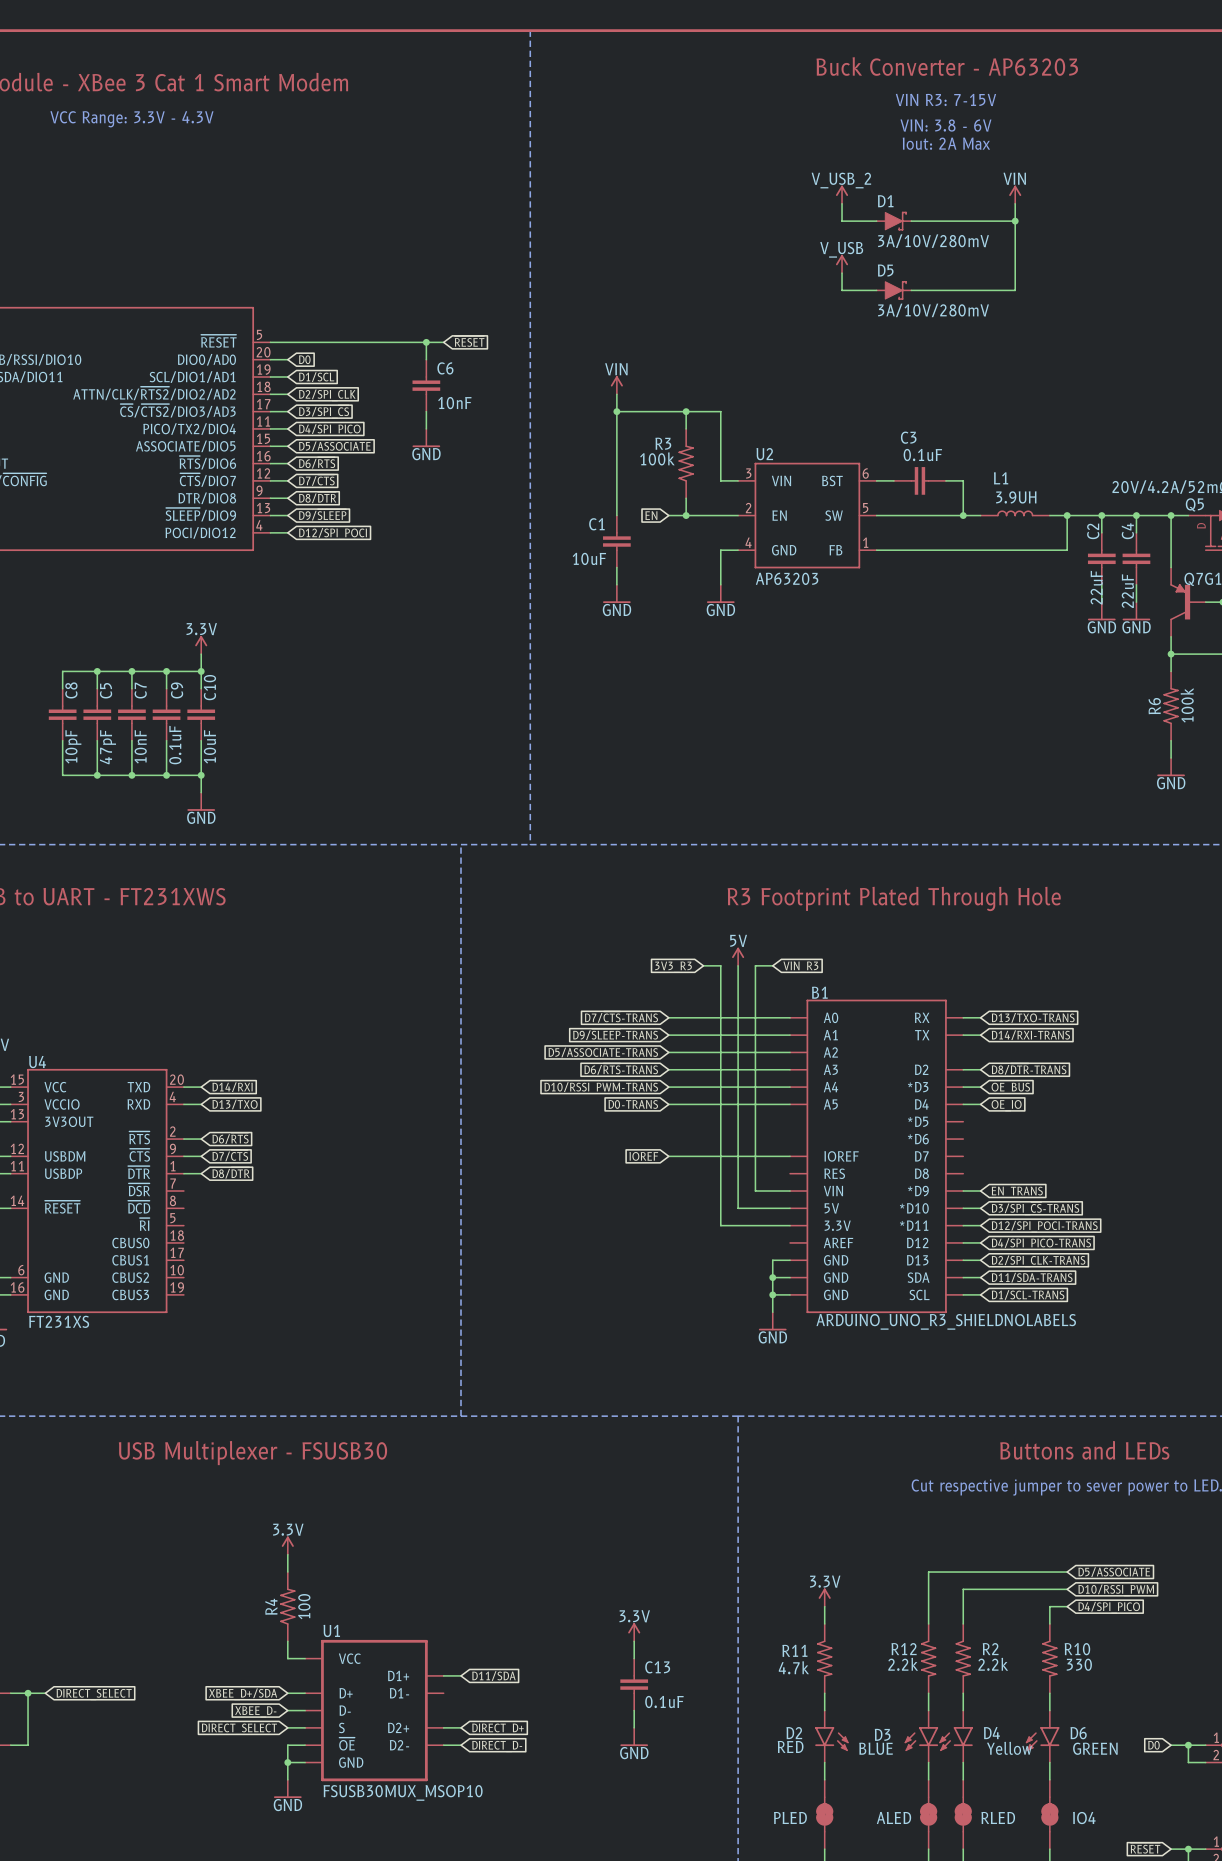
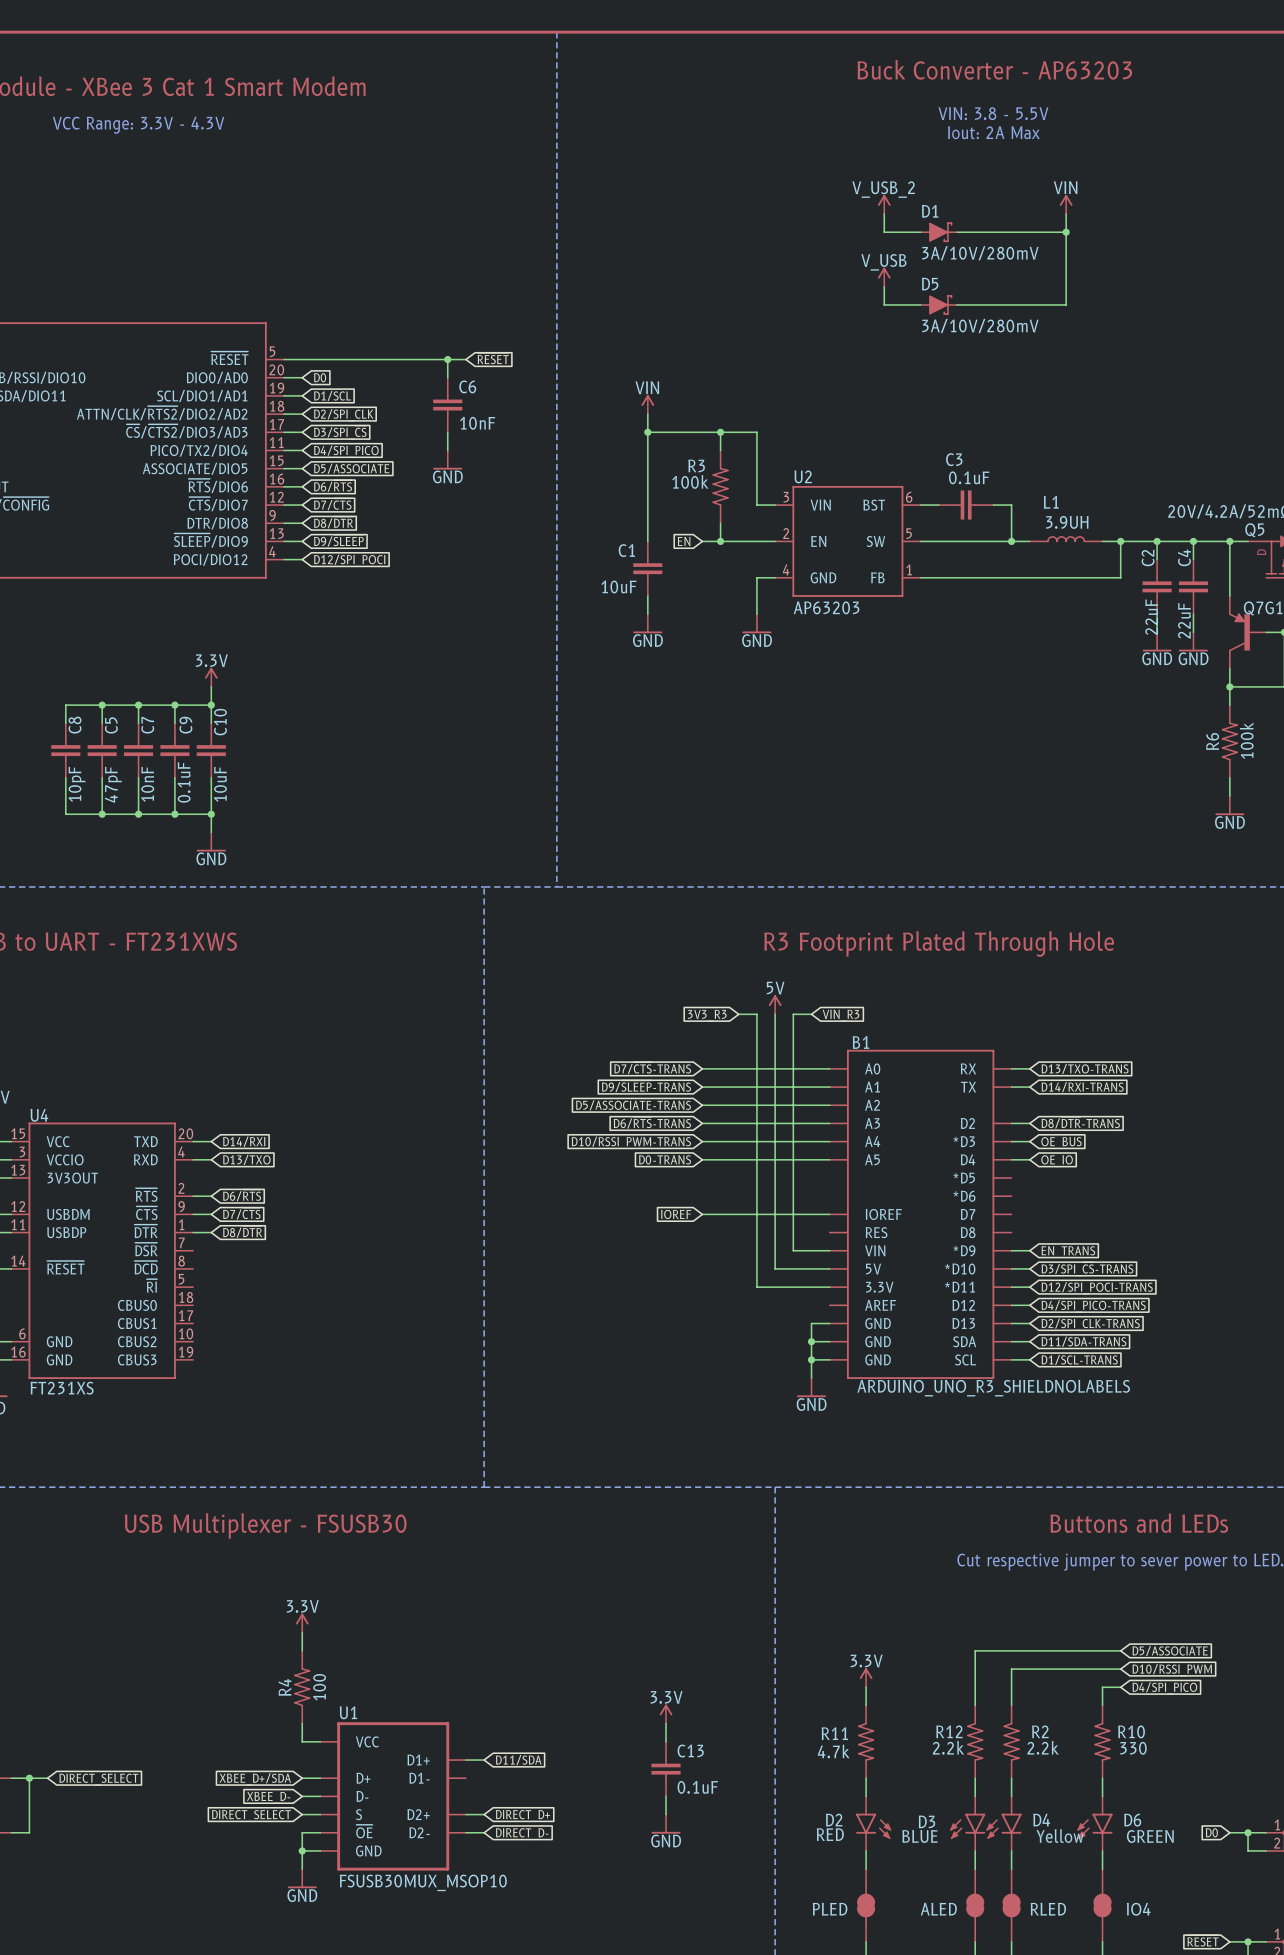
text: VIN R3: 7-15V (945, 99) -> none
text: none -> VIN: 3.8 - 5.5V (993, 113)
text: VIN: 3.8 - 6V (945, 125) -> Iout: 2A Max (993, 132)
text: Iout: 2A Max (946, 143) -> none

